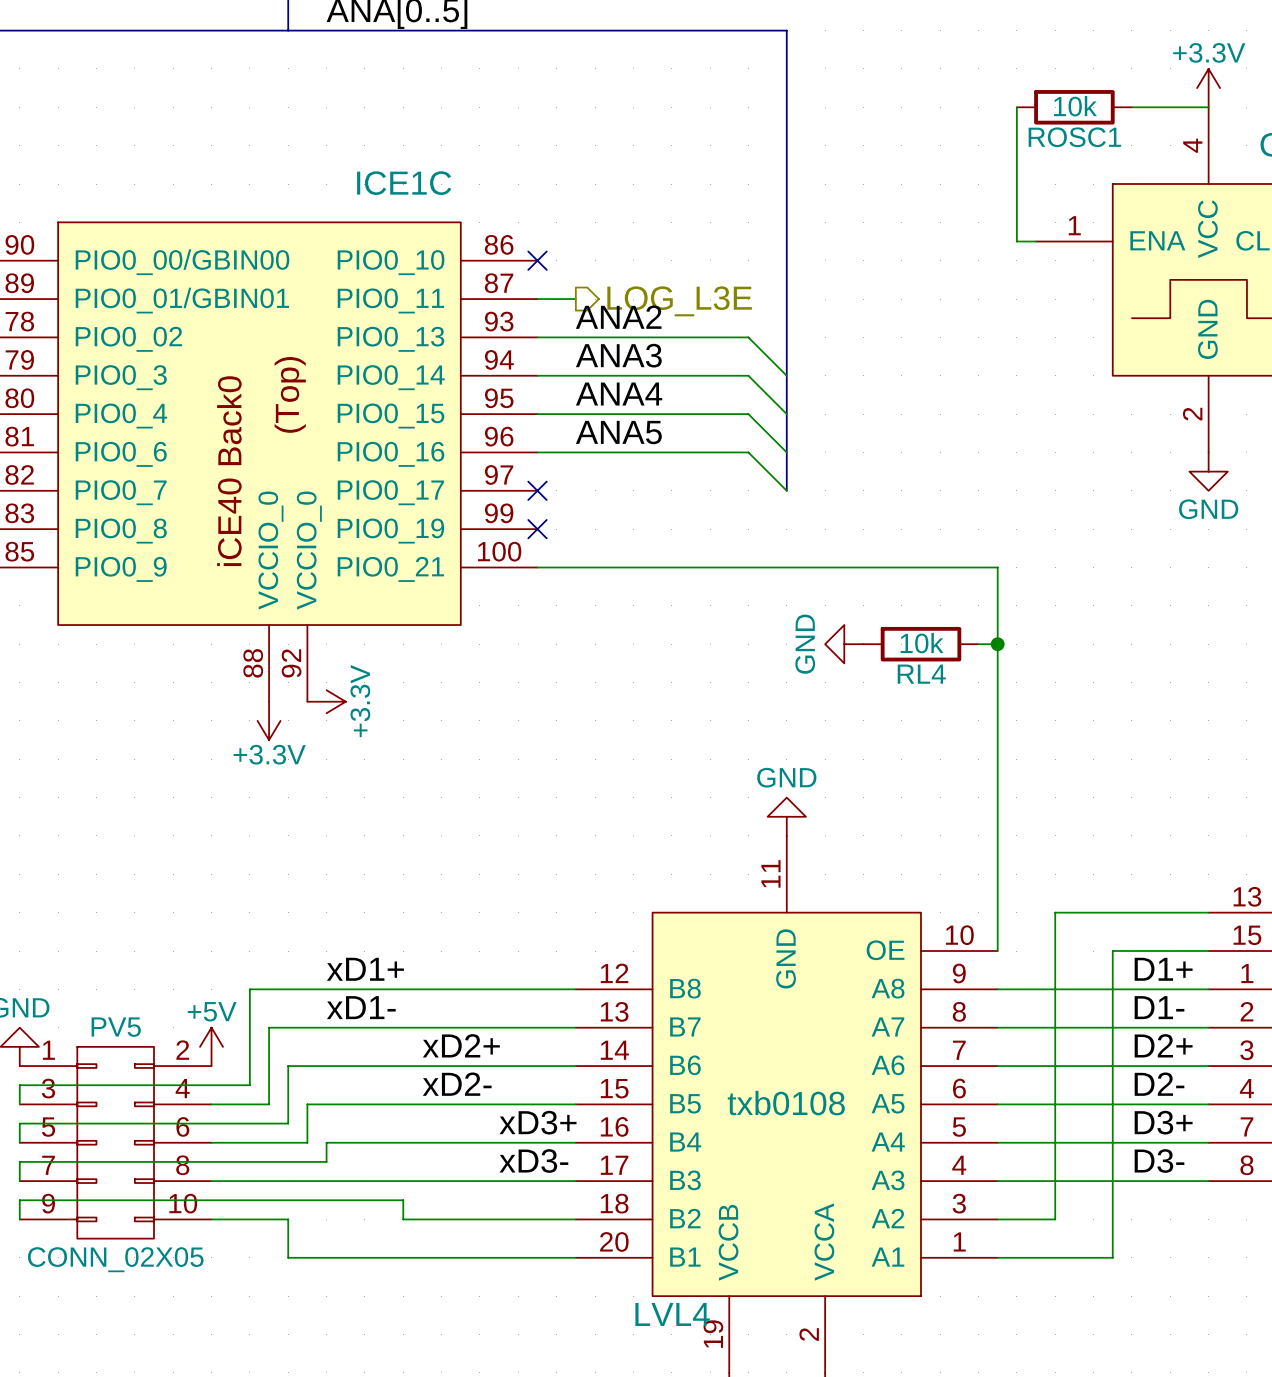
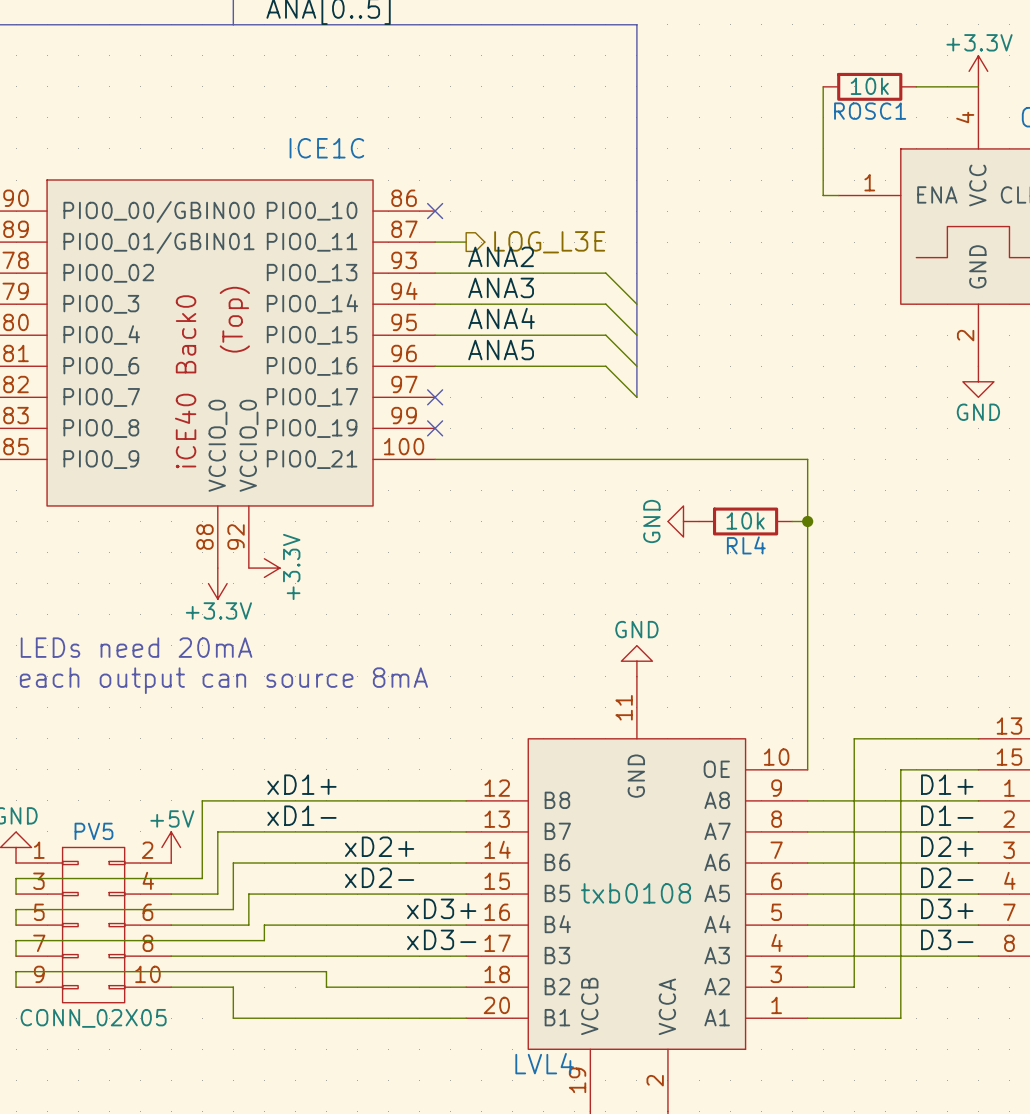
text: none -> LEDs need 20mA (136, 647)
text: none -> each output can source 8mA (223, 680)

